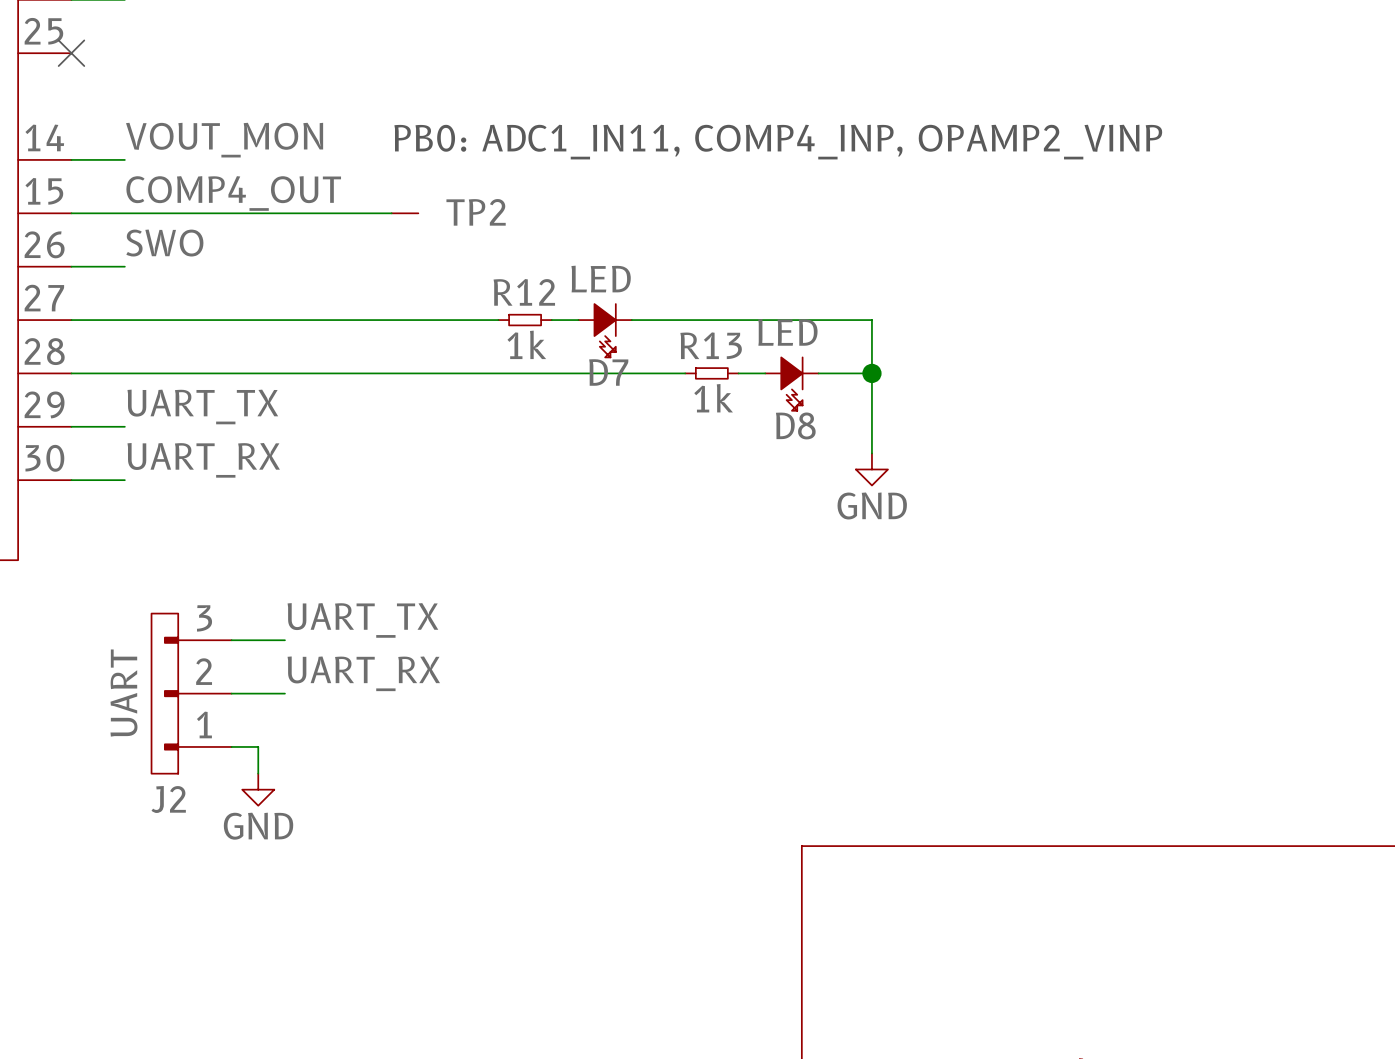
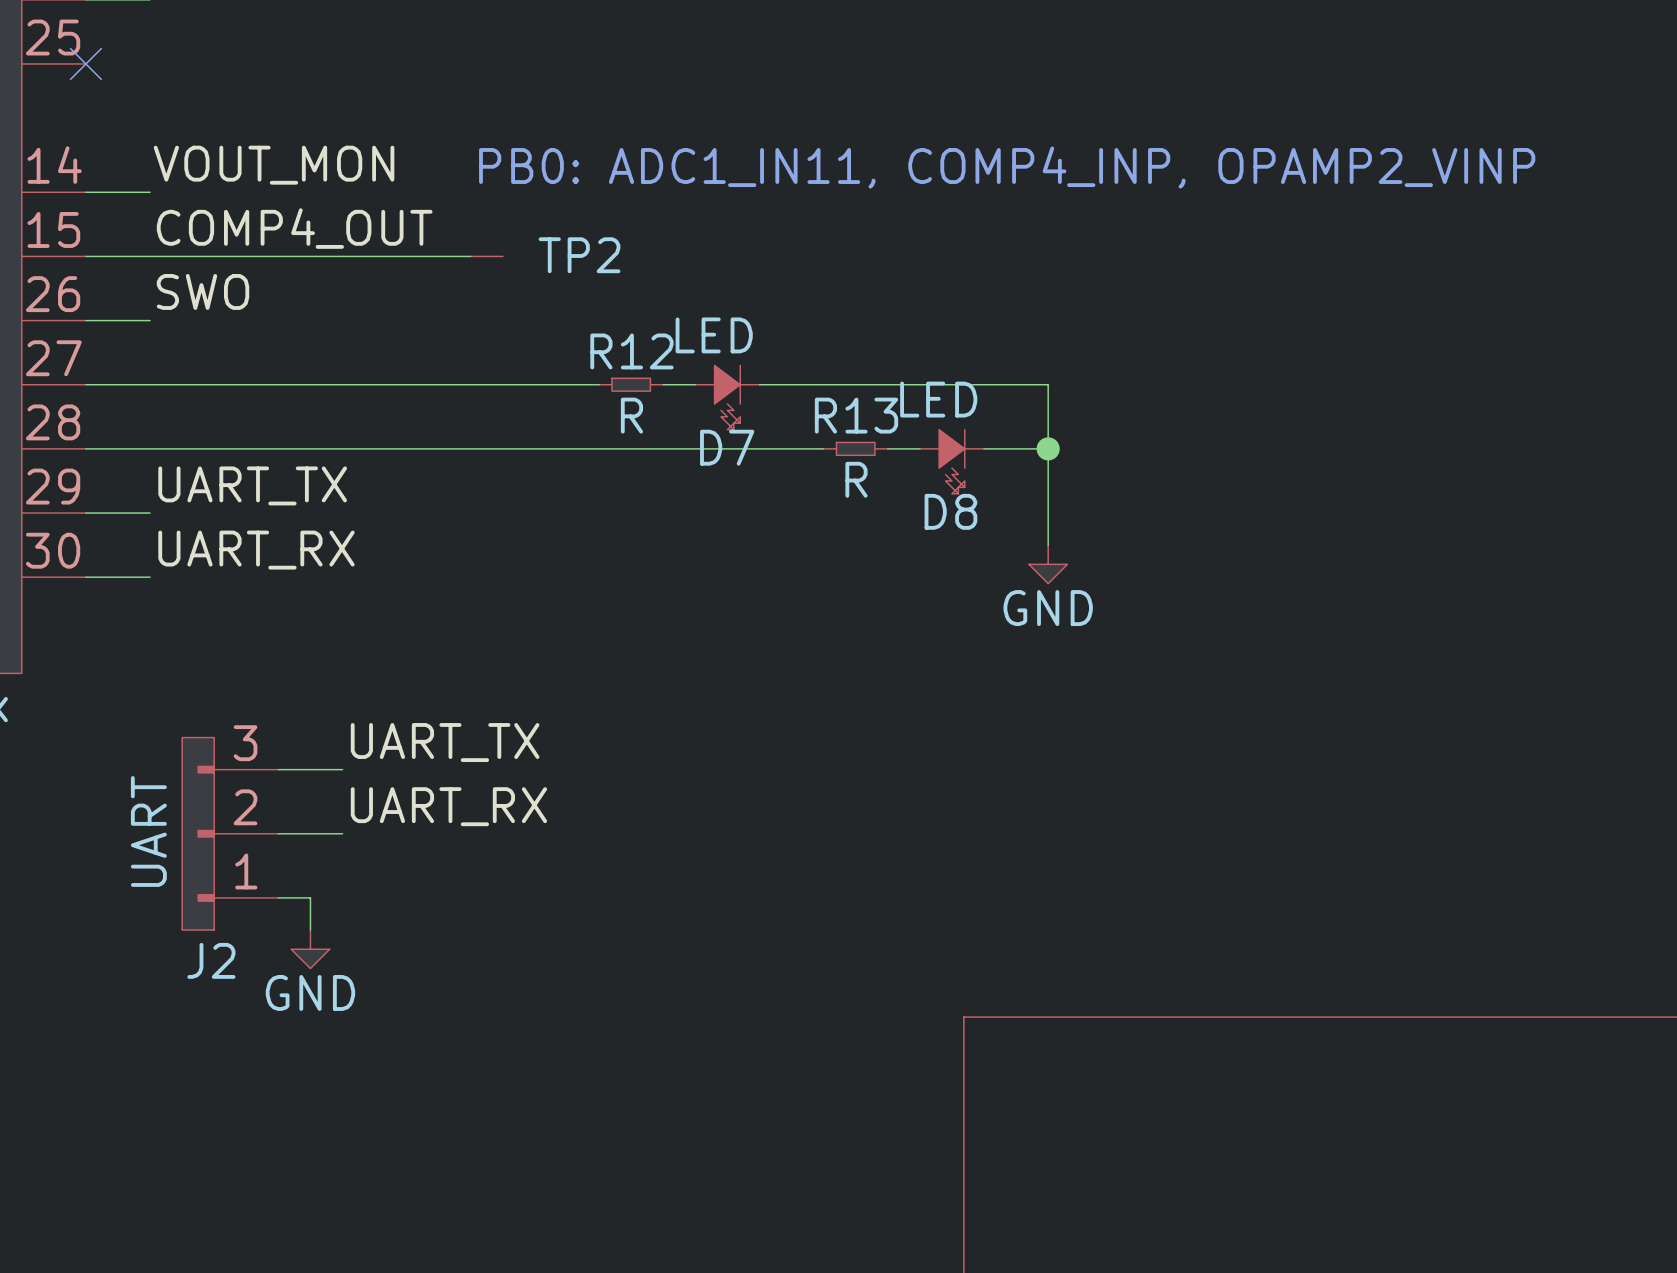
R12 value: 1k (526, 344) -> R (631, 415)
R13 value: 1k (713, 398) -> R (856, 479)

